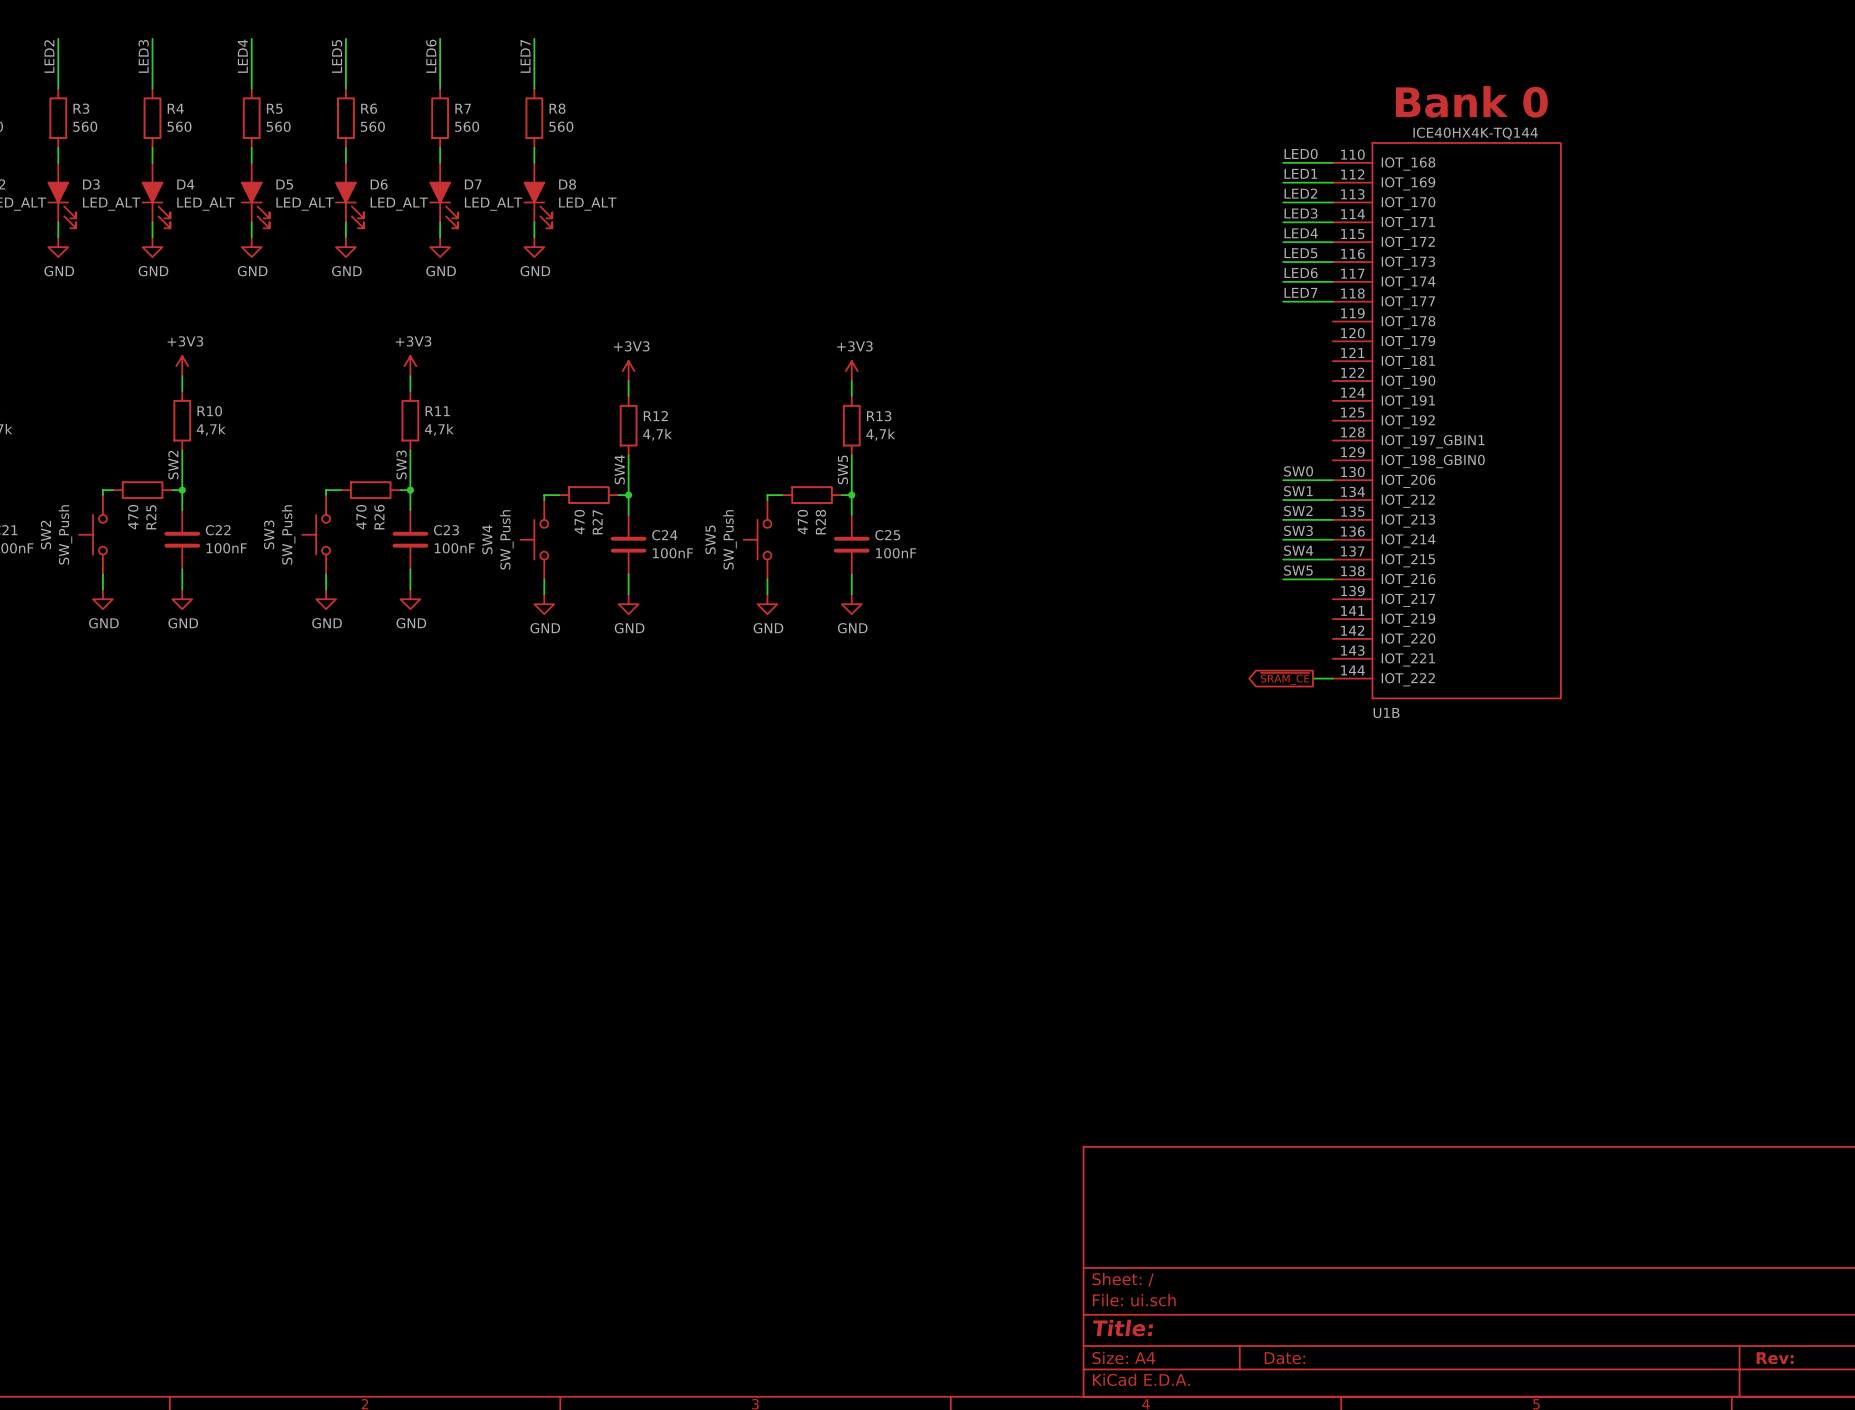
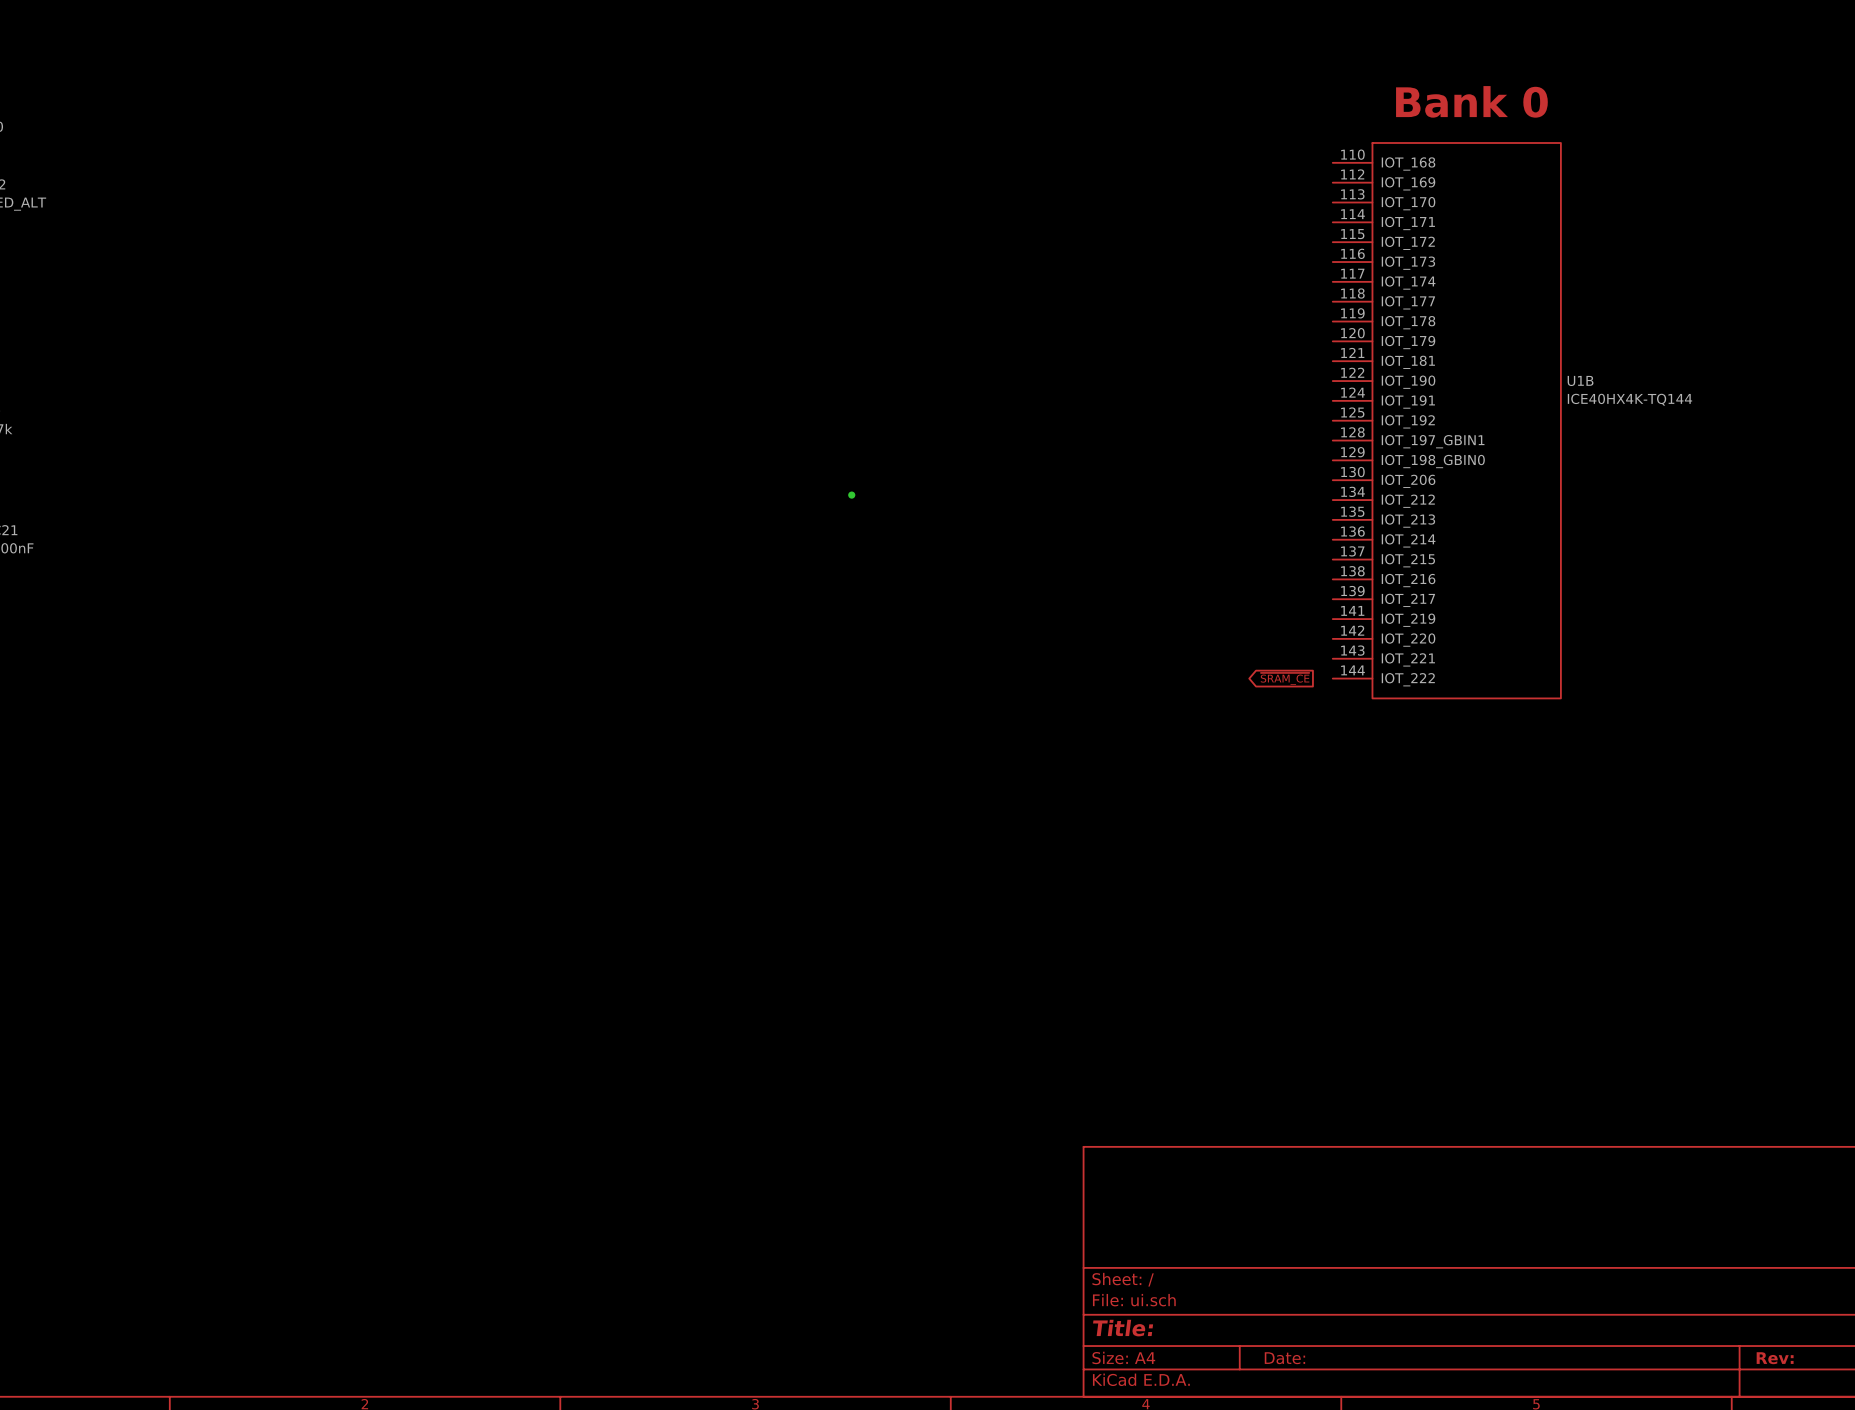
wire: (58, 38) (58, 88) -> none
wire: (152, 38) (152, 88) -> none
wire: (251, 38) (251, 88) -> none
wire: (345, 38) (345, 88) -> none
wire: (440, 38) (440, 88) -> none
wire: (534, 38) (534, 88) -> none
label: LED2 (49, 56) -> none
label: LED3 (143, 56) -> none
label: LED4 (242, 56) -> none
label: LED5 (337, 56) -> none
label: LED6 (431, 56) -> none
label: LED7 (525, 56) -> none
R3: 560 (58, 118) -> none
R4: 560 (152, 118) -> none
R5: 560 (251, 118) -> none
R6: 560 (345, 118) -> none
R7: 560 (440, 118) -> none
R8: 560 (534, 118) -> none
U1B value position: ICE40HX4K-TQ144 (1475, 133) -> ICE40HX4K-TQ144 (1629, 399)
wire: (58, 147) (58, 162) -> none
wire: (152, 147) (152, 162) -> none
wire: (251, 147) (251, 162) -> none
wire: (345, 147) (345, 162) -> none
wire: (440, 147) (440, 162) -> none
wire: (534, 147) (534, 162) -> none
label: LED0 (1301, 153) -> none
wire: (1283, 162) (1332, 162) -> none
label: LED1 (1300, 173) -> none
wire: (1283, 182) (1332, 182) -> none
label: LED2 (1300, 193) -> none
D3: LED_ALT (61, 195) -> none
D4: LED_ALT (156, 195) -> none
D5: LED_ALT (255, 195) -> none
D6: LED_ALT (349, 195) -> none
D7: LED_ALT (443, 195) -> none
D8: LED_ALT (537, 195) -> none
wire: (1283, 202) (1332, 202) -> none
label: LED3 (1300, 213) -> none
wire: (58, 222) (58, 237) -> none
wire: (152, 222) (152, 237) -> none
wire: (251, 222) (251, 237) -> none
wire: (345, 222) (345, 237) -> none
wire: (440, 222) (440, 237) -> none
wire: (534, 222) (534, 237) -> none
wire: (1283, 222) (1332, 222) -> none
label: LED4 (1301, 233) -> none
wire: (1283, 242) (1332, 242) -> none
power symbol: GND (58, 247) -> none
power symbol: GND (152, 247) -> none
power symbol: GND (251, 247) -> none
power symbol: GND (345, 247) -> none
power symbol: GND (440, 247) -> none
power symbol: GND (534, 247) -> none
label: LED5 (1300, 253) -> none
wire: (1283, 262) (1332, 262) -> none
label: LED6 (1301, 273) -> none
wire: (1283, 281) (1332, 281) -> none
label: LED7 (1300, 292) -> none
wire: (1283, 301) (1332, 301) -> none
power symbol: +3V3 (182, 366) -> none
power symbol: +3V3 (410, 366) -> none
power symbol: +3V3 (628, 371) -> none
power symbol: +3V3 (851, 371) -> none
wire: (182, 376) (182, 390) -> none
wire: (410, 376) (410, 390) -> none
wire: (628, 381) (628, 395) -> none
wire: (851, 381) (851, 395) -> none
R10: 4,7k (182, 420) -> none
R11: 4,7k (410, 420) -> none
R12: 4,7k (628, 425) -> none
R13: 4,7k (851, 425) -> none
wire: (182, 450) (182, 509) -> none
wire: (410, 450) (410, 509) -> none
wire: (628, 455) (628, 514) -> none
wire: (851, 455) (851, 514) -> none
label: SW3 (401, 464) -> none
label: SW2 (173, 465) -> none
label: SW4 (619, 469) -> none
label: SW5 (842, 469) -> none
label: SW0 (1298, 471) -> none
wire: (1283, 480) (1332, 480) -> none
wire: (112, 490) (102, 490) (102, 495) -> none
R25: 470 (142, 490) -> none
wire: (172, 490) (182, 490) -> none
junction: (182, 490) -> none
wire: (340, 490) (326, 490) (326, 495) -> none
R26: 470 (370, 490) -> none
wire: (400, 490) (410, 490) -> none
junction: (410, 490) -> none
label: SW1 (1298, 491) -> none
wire: (559, 495) (544, 495) (544, 500) -> none
R27: 470 (588, 495) -> none
wire: (618, 495) (628, 495) -> none
junction: (628, 495) -> none
wire: (782, 495) (767, 495) (767, 500) -> none
R28: 470 (812, 495) -> none
wire: (841, 495) (851, 495) -> none
wire: (1283, 500) (1332, 500) -> none
label: SW2 (1298, 511) -> none
wire: (1283, 519) (1332, 519) -> none
label: SW3 (1298, 530) -> none
SW2: SW_Push (93, 534) -> none
SW3: SW_Push (316, 534) -> none
C22: 100nF (182, 539) -> none
C23: 100nF (410, 539) -> none
SW4: SW_Push (534, 539) -> none
SW5: SW_Push (757, 539) -> none
wire: (1283, 539) (1332, 539) -> none
C24: 100nF (628, 544) -> none
C25: 100nF (851, 544) -> none
label: SW4 (1298, 550) -> none
wire: (1283, 559) (1332, 559) -> none
wire: (182, 569) (182, 589) -> none
wire: (410, 569) (410, 589) -> none
label: SW5 (1298, 570) -> none
wire: (102, 574) (102, 589) -> none
wire: (326, 574) (326, 589) -> none
wire: (628, 574) (628, 594) -> none
wire: (851, 574) (851, 594) -> none
wire: (544, 579) (544, 594) -> none
wire: (767, 579) (767, 594) -> none
wire: (1283, 579) (1332, 579) -> none
power symbol: GND (102, 599) -> none
power symbol: GND (182, 599) -> none
power symbol: GND (326, 599) -> none
power symbol: GND (410, 599) -> none
power symbol: GND (544, 604) -> none
power symbol: GND (628, 604) -> none
power symbol: GND (767, 604) -> none
power symbol: GND (851, 604) -> none
wire: (1312, 678) (1332, 678) -> none
U1B name position: U1B (1386, 713) -> U1B (1580, 380)

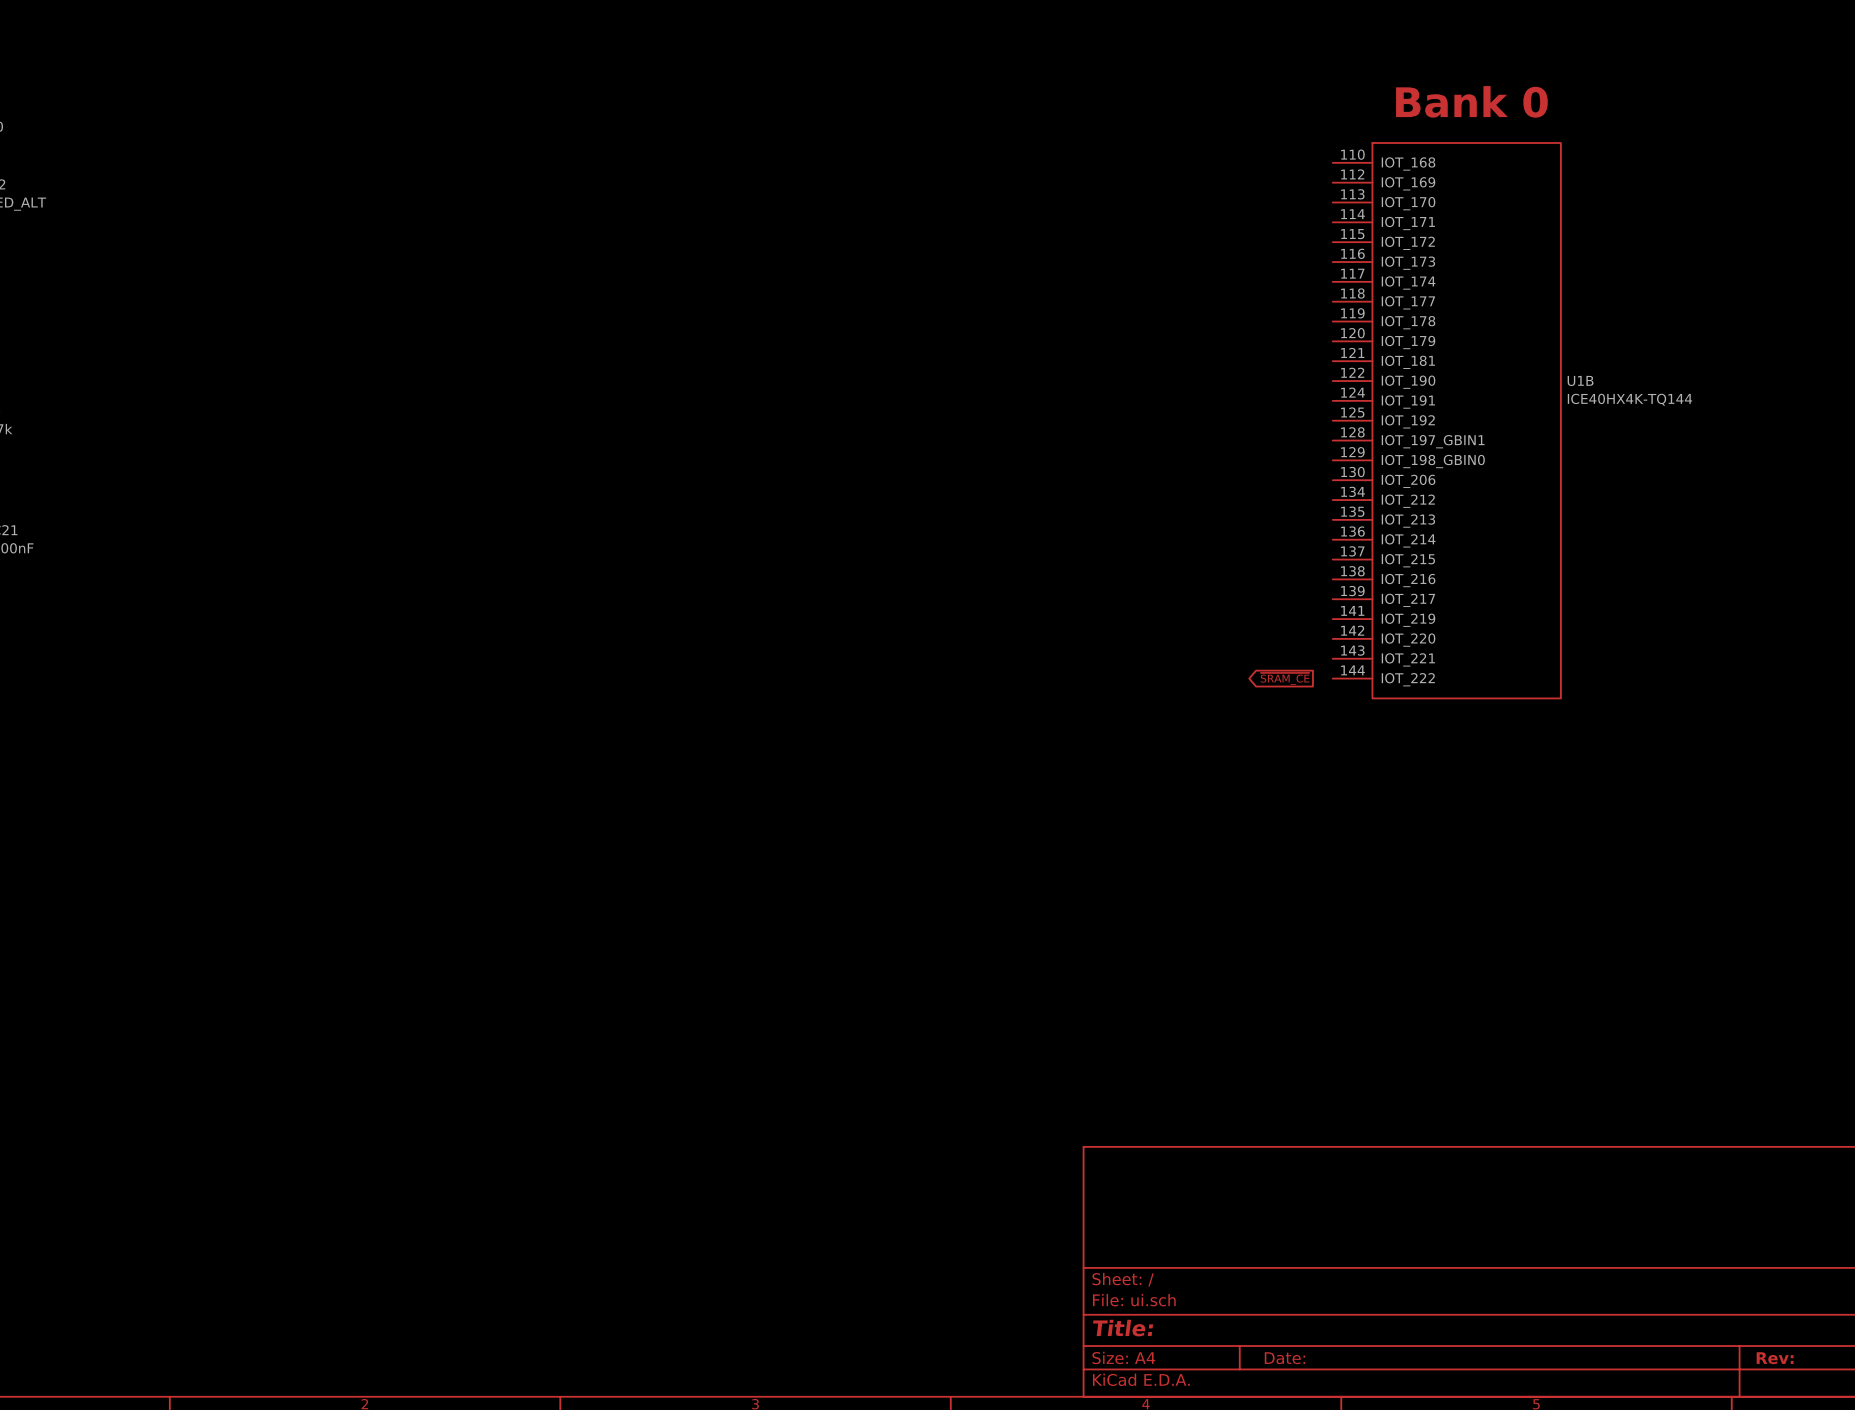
junction: (851, 495) -> none

